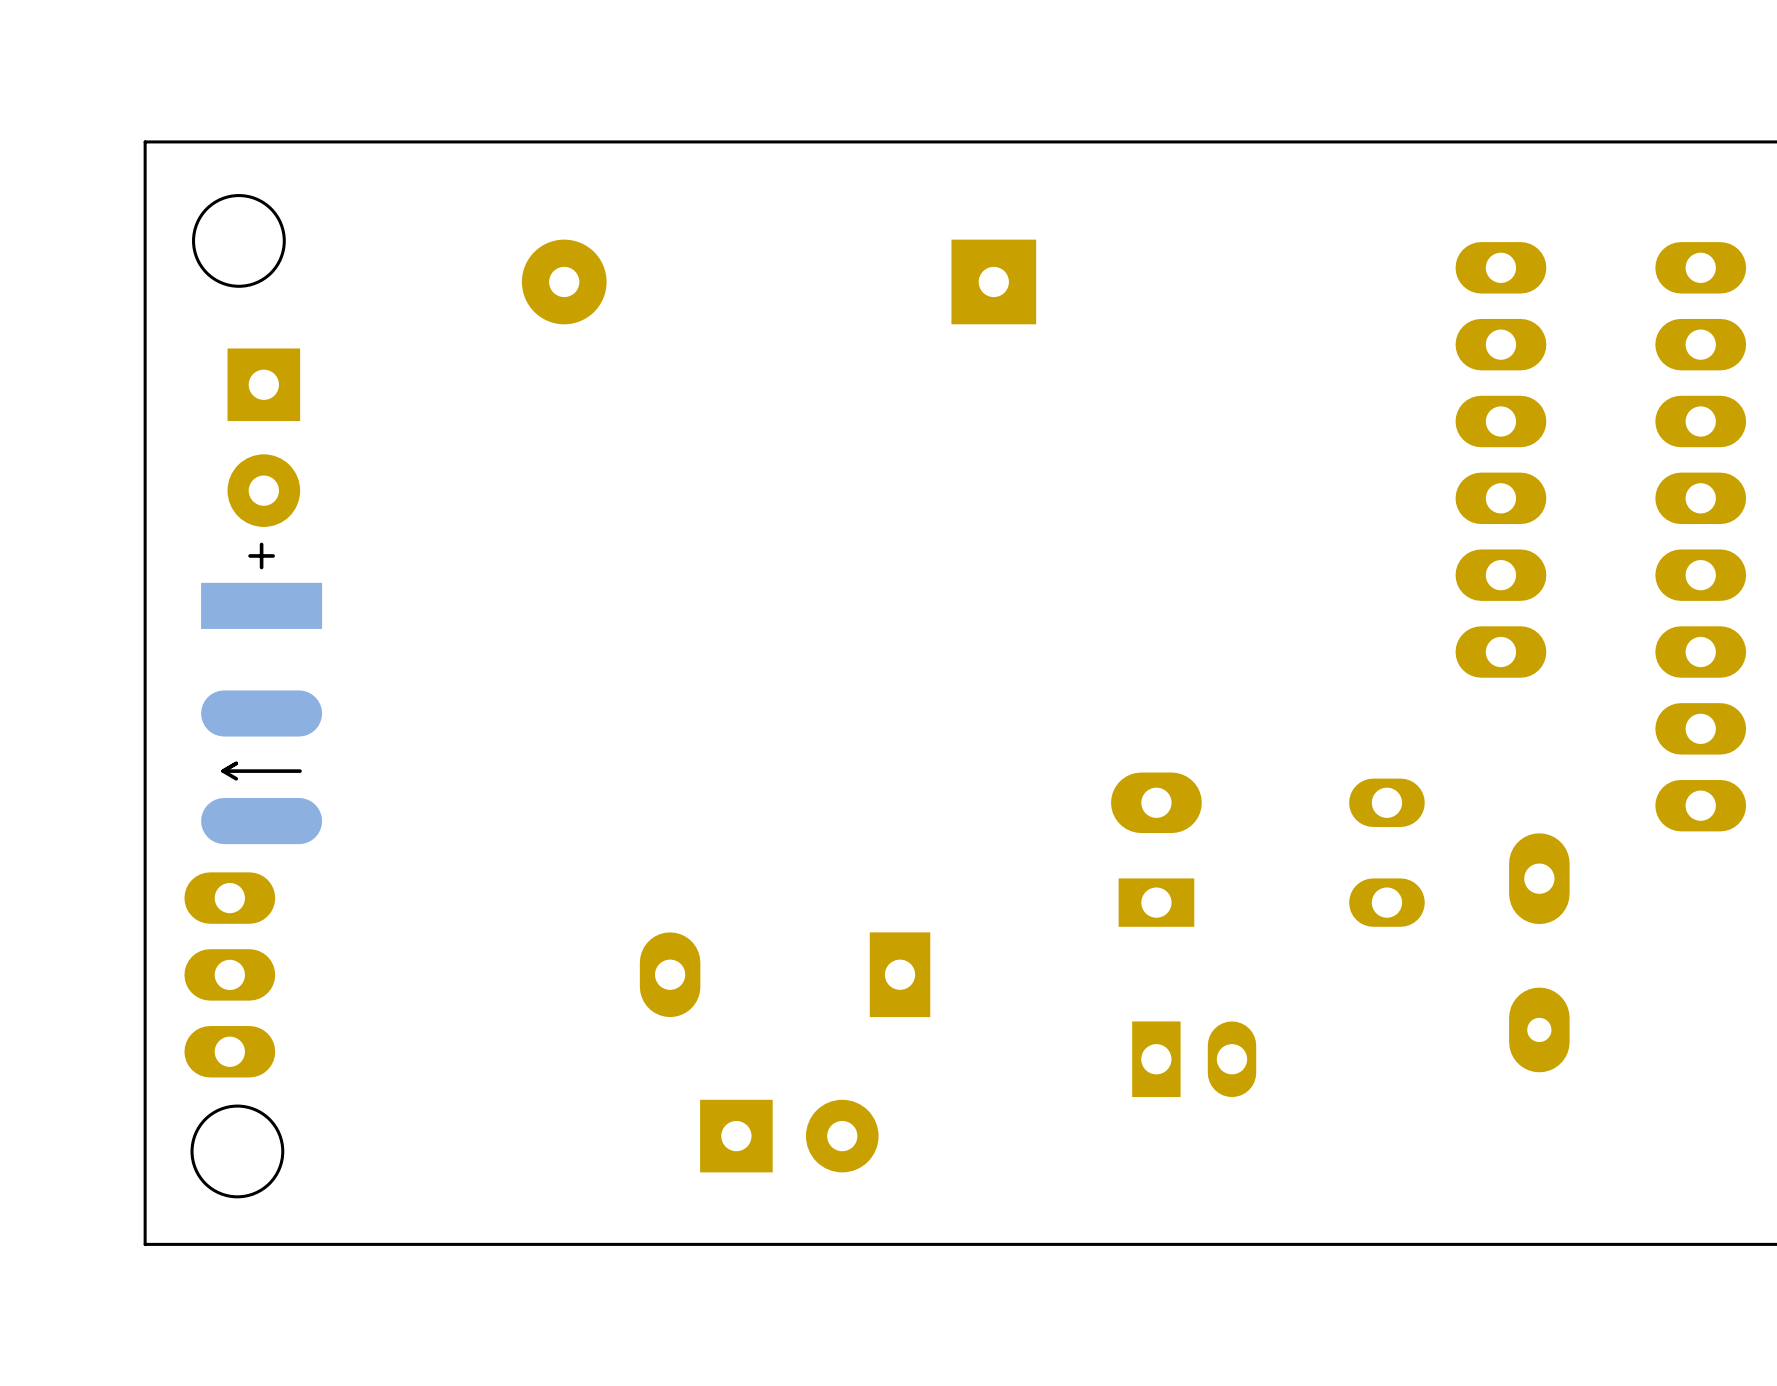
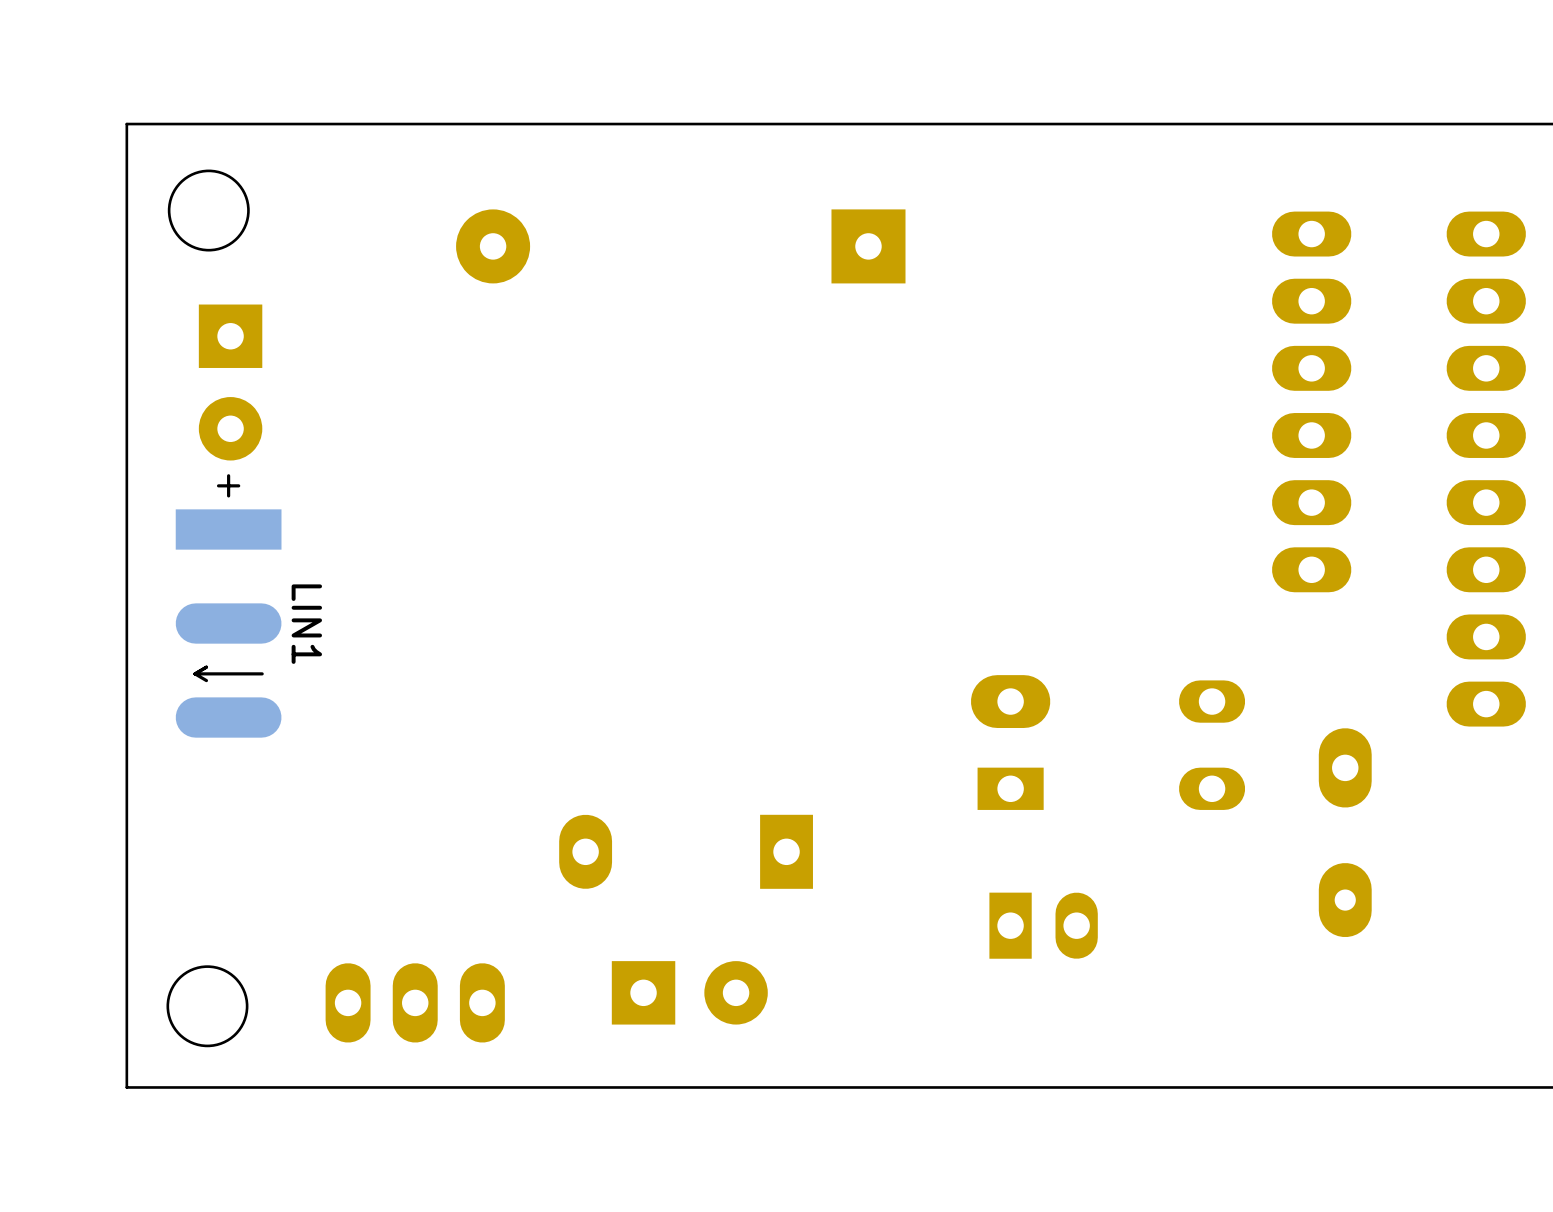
LIN1 name: none -> LIN1 (306, 624)
part rotation: 0° (229, 974) -> 90° clockwise (415, 1002)
part position: (229, 974) -> (415, 1002)

